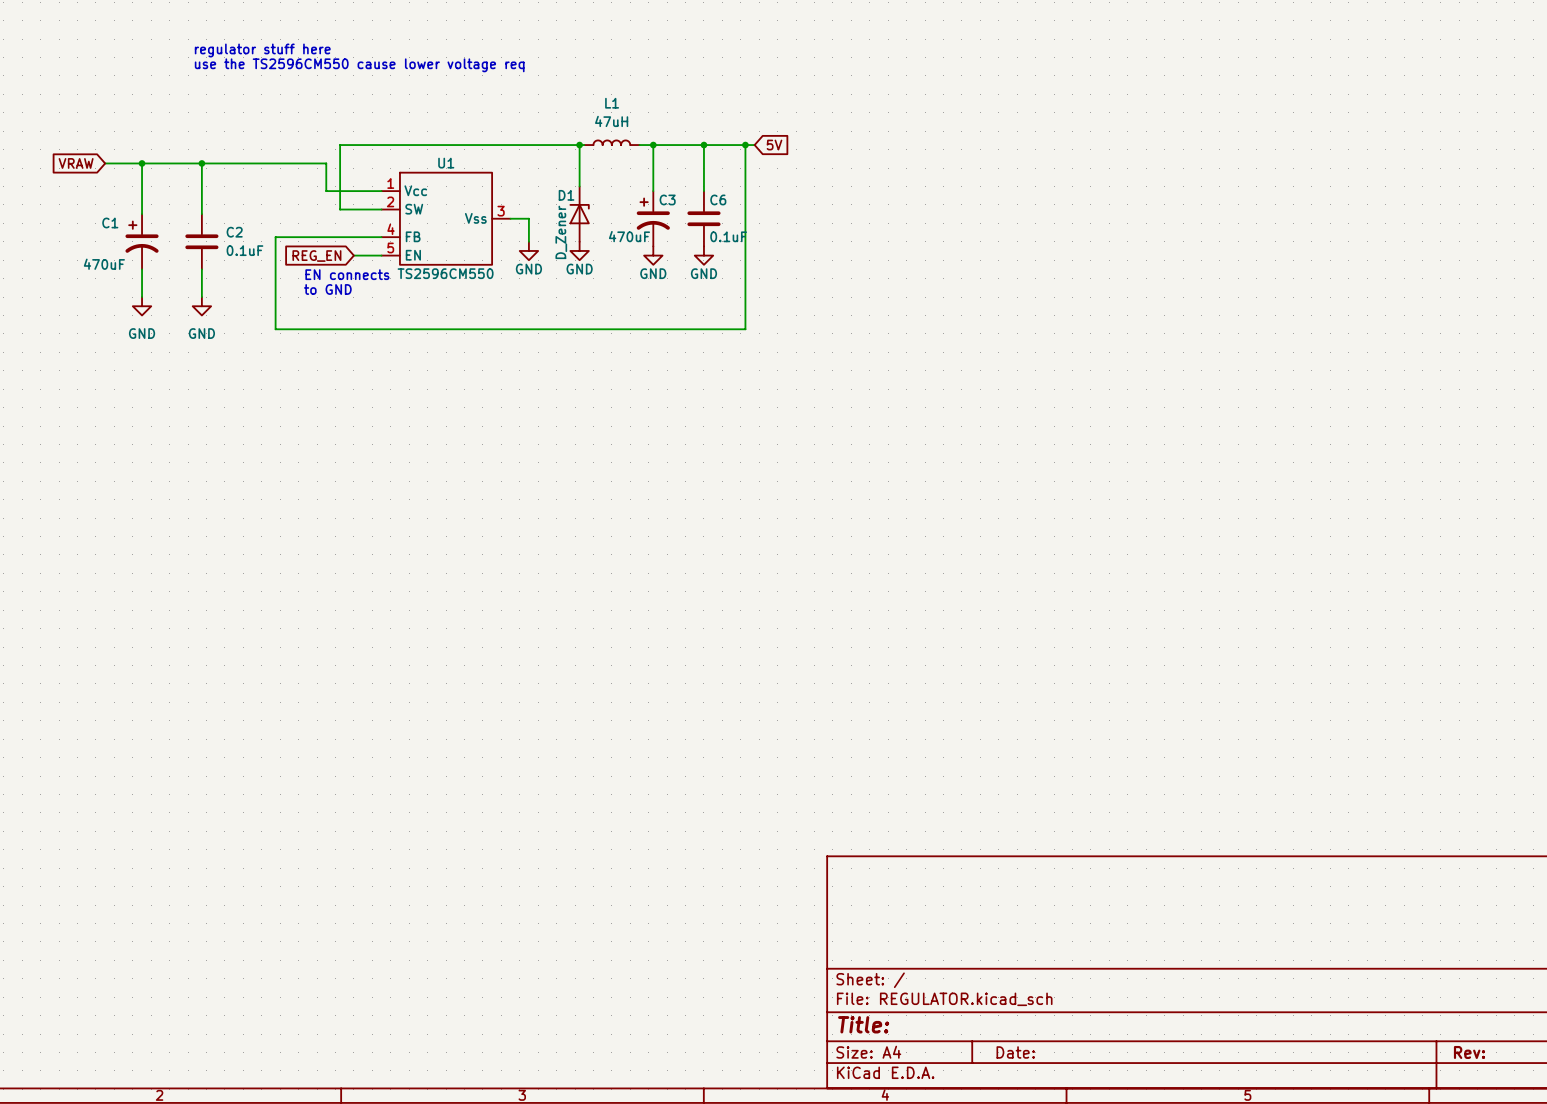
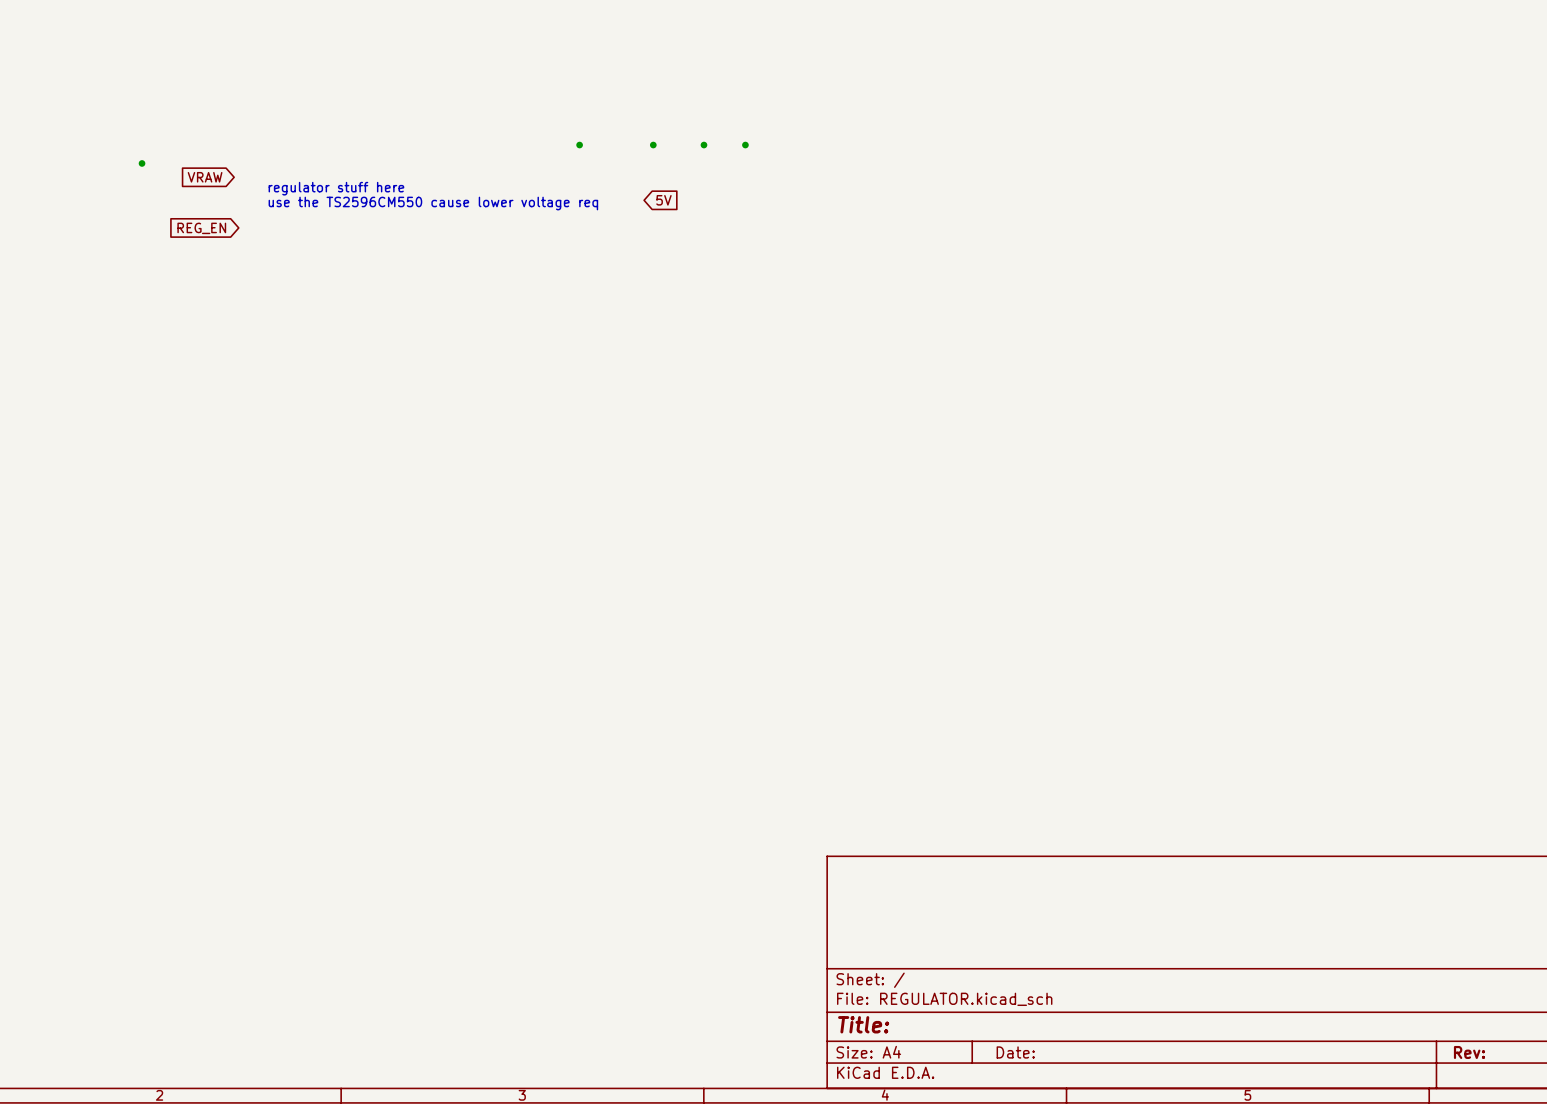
text position: regulator stuff here (262, 50) -> regulator stuff here (336, 188)
text position: use the TS2596CM550 cause lower voltage req (359, 65) -> use the TS2596CM550 cause lower voltage req (433, 203)
L1: 47uH (611, 142) -> none
wire: (579, 145) (579, 186) -> none
wire: (584, 145) (340, 145) (340, 209) (381, 209) -> none
wire: (639, 145) (754, 145) -> none
wire: (653, 145) (653, 191) -> none
wire: (703, 145) (703, 191) -> none
wire: (745, 145) (745, 329) (275, 329) (275, 237) (381, 237) -> none
global label position: 5V (774, 145) -> 5V (663, 200)
global label position: VRAW (76, 163) -> VRAW (205, 177)
wire: (105, 163) (326, 163) (326, 191) (381, 191) -> none
wire: (142, 163) (142, 214) -> none
wire: (201, 163) (201, 214) -> none
junction: (201, 163) -> none
D1: D_Zener (579, 214) -> none
U1: TS2596CM550 (446, 218) -> none
wire: (510, 218) (528, 218) (528, 241) -> none
C3: 470uF (653, 218) -> none
C6: 0.1uF (703, 218) -> none
C1: 470uF (142, 241) -> none
C2: 0.1uF (201, 241) -> none
power symbol: GND (528, 250) -> none
power symbol: GND (579, 250) -> none
wire: (353, 255) (381, 255) -> none
power symbol: GND (653, 255) -> none
power symbol: GND (703, 255) -> none
global label position: REG_EN (316, 256) -> REG_EN (201, 228)
wire: (142, 269) (142, 297) -> none
wire: (201, 269) (201, 297) -> none
text: EN connects (347, 274) -> none
text: to GND (327, 289) -> none
power symbol: GND (142, 306) -> none
power symbol: GND (201, 306) -> none

